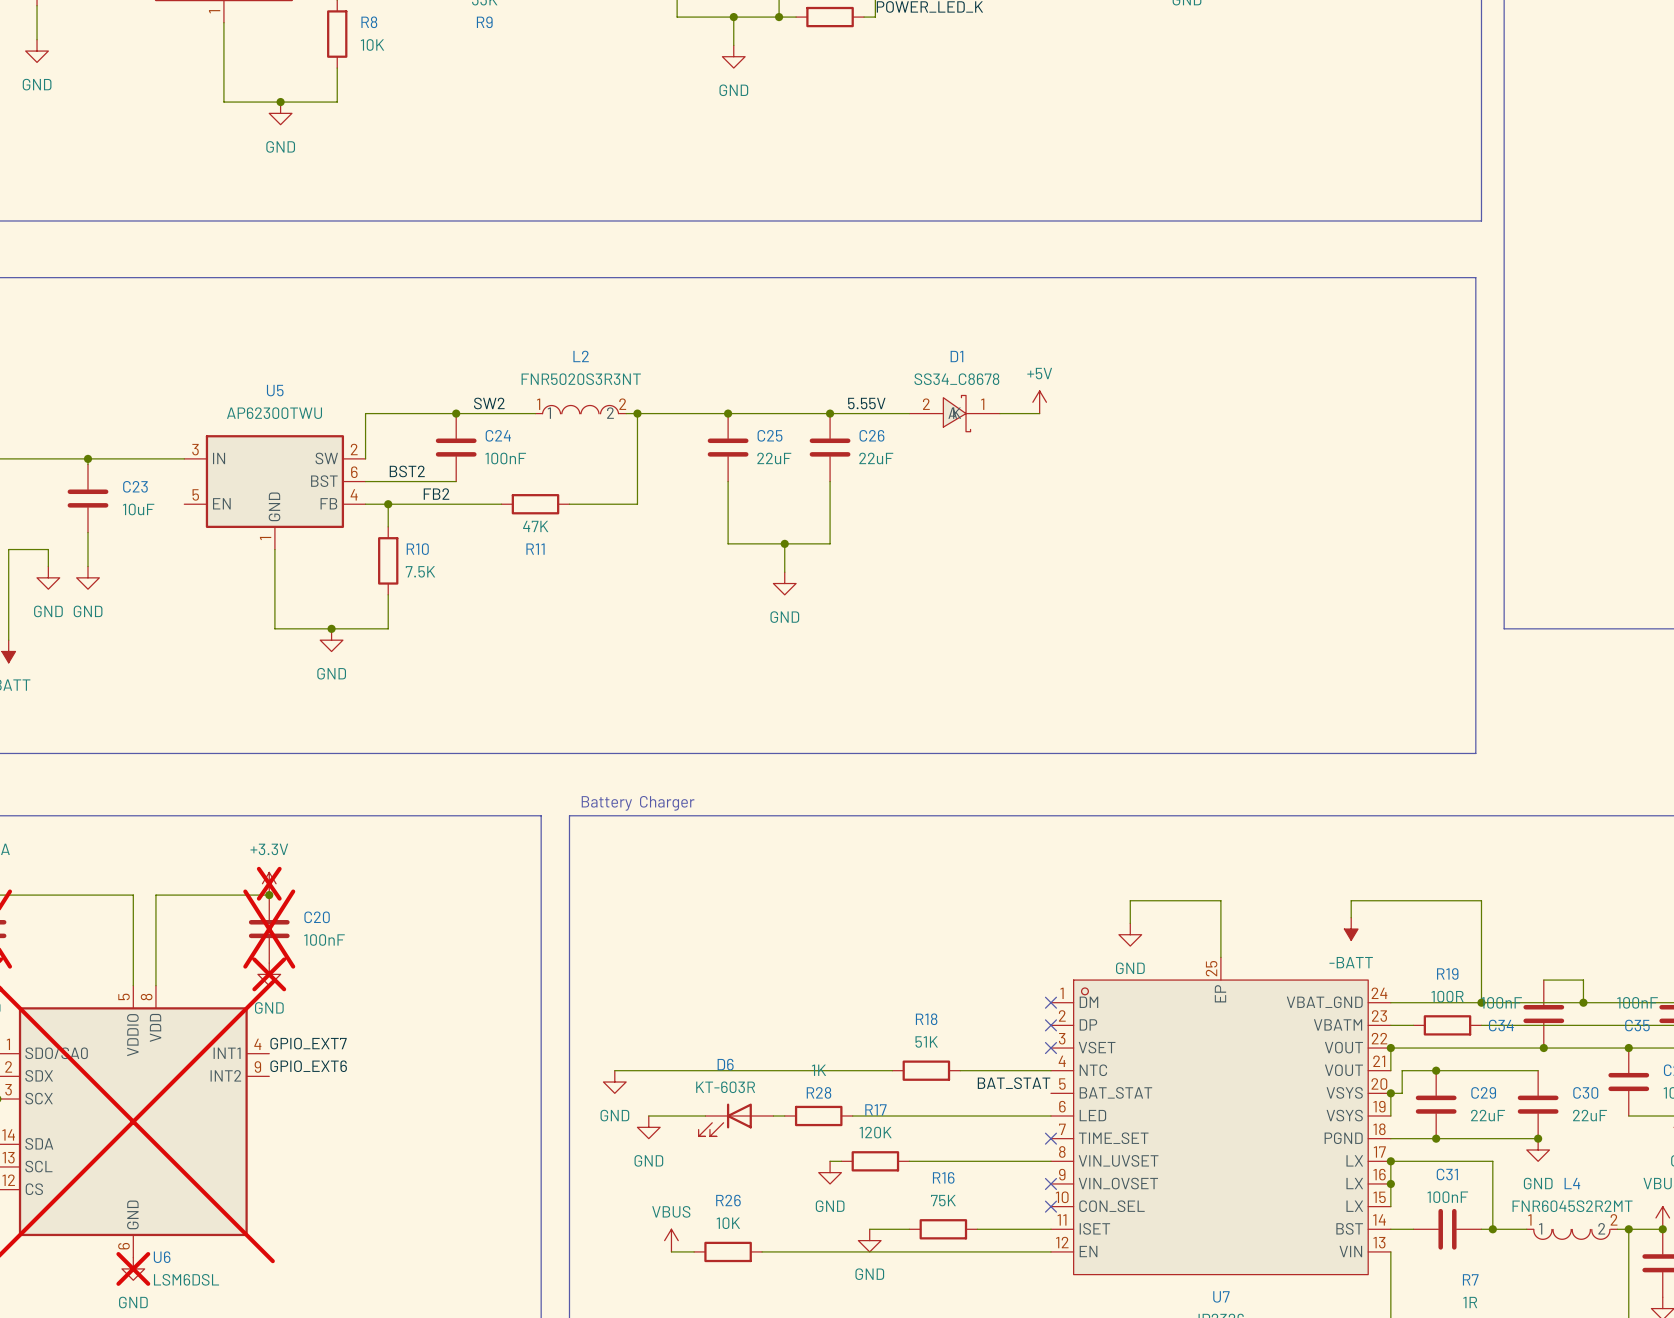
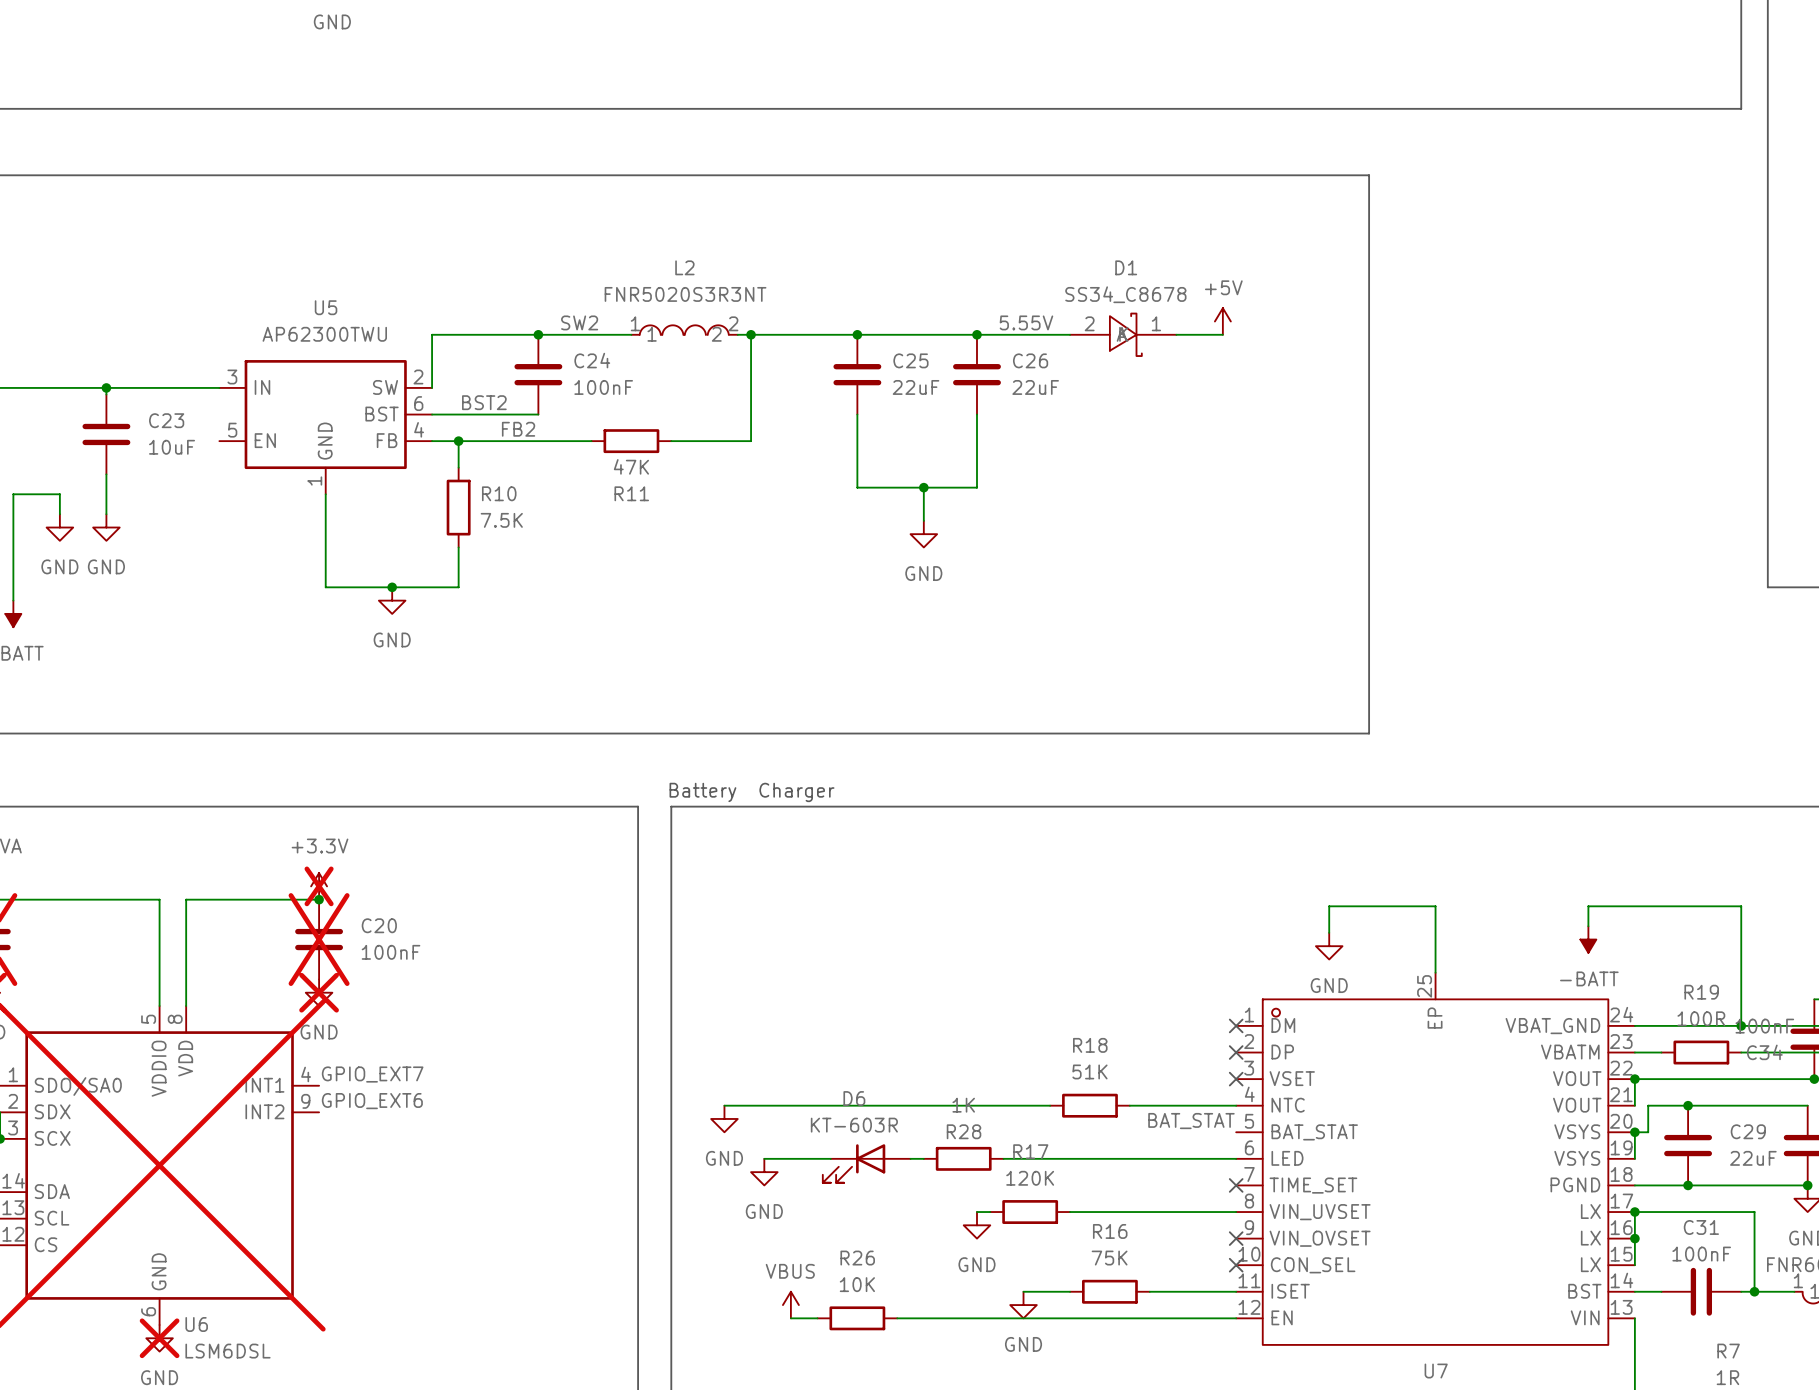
line: (1164, 277) (1475, 277) (1475, 753) (1164, 753) -> (1369, 175) (1369, 733)

